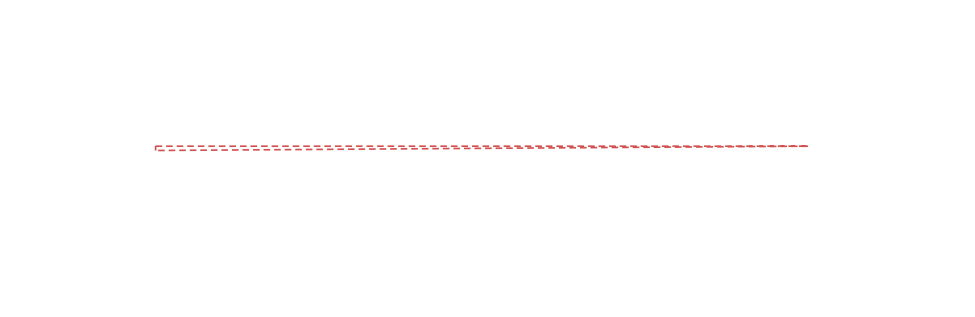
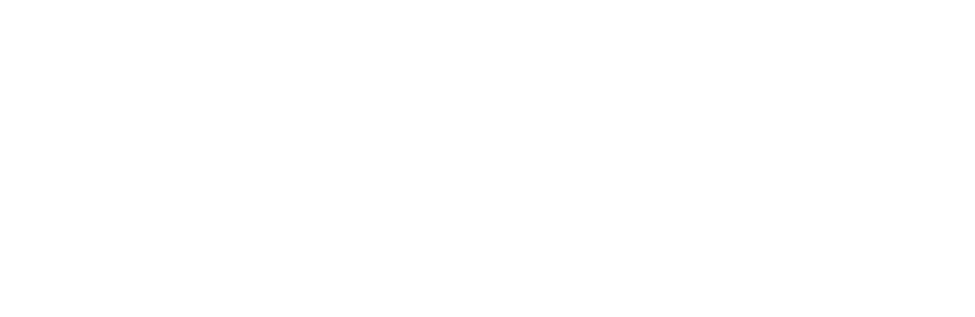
zone outline: (155, 146) (808, 146) (155, 150) (155, 146) -> none

